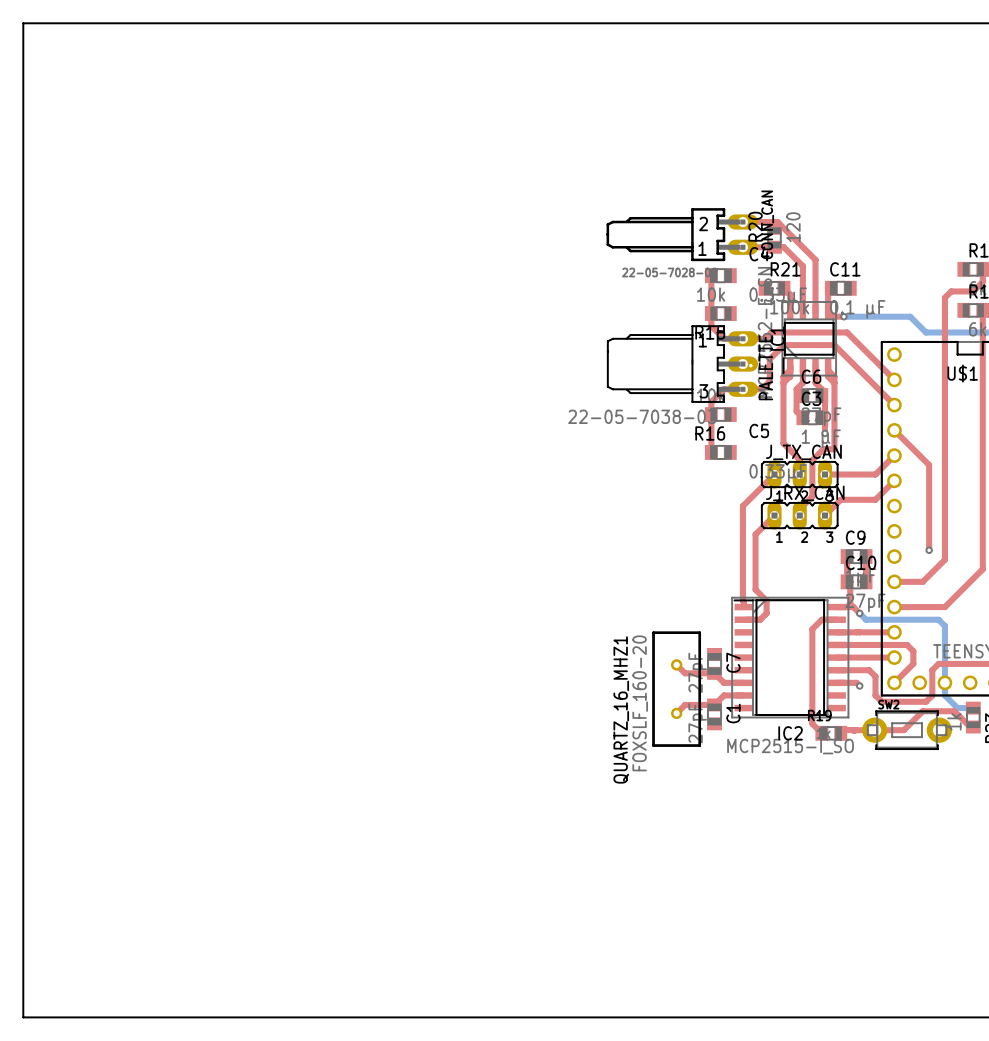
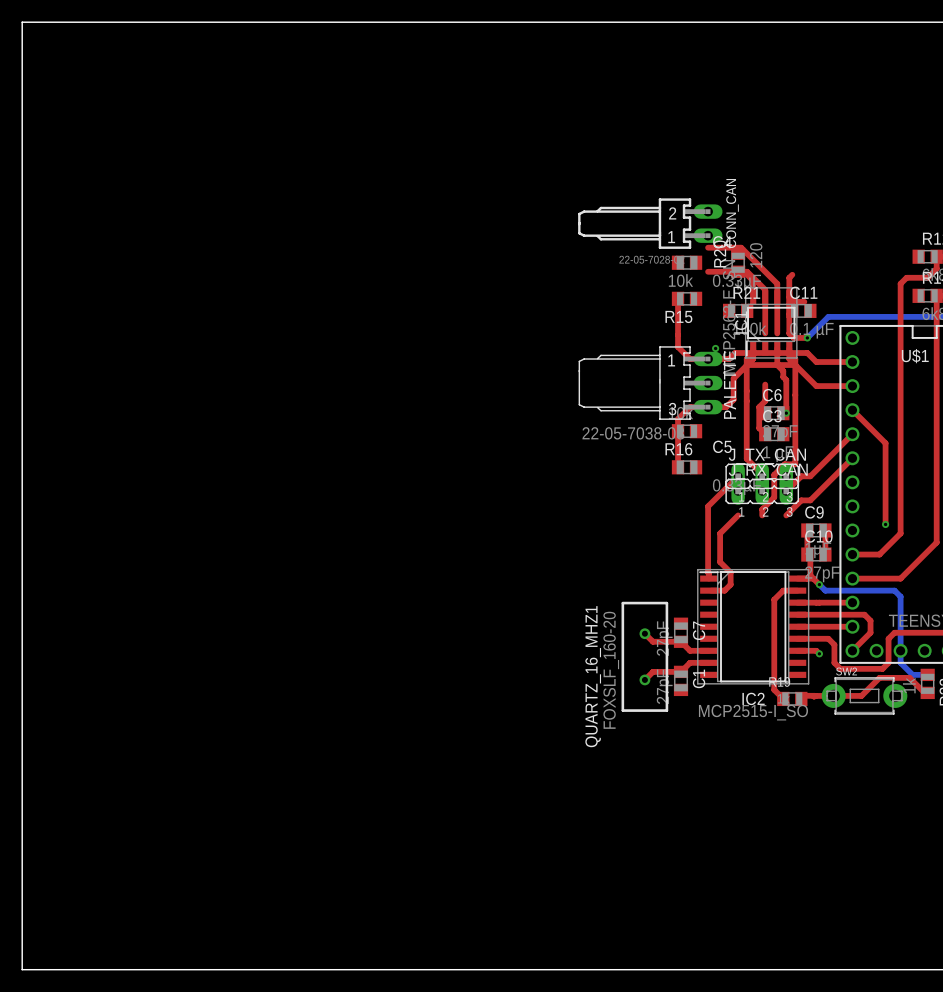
top track: (742, 222) (777, 222) (815, 259) (815, 297) -> (708, 247) (741, 247) (777, 283)
R20 position: (774, 237) -> (738, 262)
top track: (742, 247) (783, 247) (802, 266) (802, 304) -> (708, 271) (747, 271) (765, 289)
top track: (711, 275) (711, 313) -> (765, 297) (765, 333)
R21 position: (774, 288) -> (738, 310)
C11 position: (840, 288) -> (801, 310)
top track: none -> (777, 297) (777, 333)
bottom track: (843, 316) (910, 316) (926, 332) -> (807, 337) (828, 316) (882, 316)
via position: (843, 316) -> (807, 337)
top track: (711, 326) (723, 338) (765, 338) (771, 332) (847, 332) (894, 379) -> (678, 310) (678, 347) (690, 359) (729, 359) (735, 352) (807, 352) (816, 362) (852, 362)
top track: none -> (792, 310) (789, 313) (789, 333) (793, 337) (807, 337)
PALETTE position: (682, 364) -> (650, 383)
top track: (802, 365) (802, 382) (796, 389) (796, 411) (802, 417) -> (765, 384) (765, 401) (759, 407) (759, 428) (765, 434)
C6 position: (812, 395) -> (774, 413)
top track: (894, 405) (834, 345) (783, 345) (769, 359) (769, 381) (761, 389) (723, 389) (711, 401) (711, 439) -> (852, 386) (816, 386) (795, 365) (747, 365) (733, 378) (733, 399) (726, 407) (690, 407) (678, 419)
R16 position: (720, 414) -> (687, 431)
C3 position: (812, 417) -> (774, 434)
top track: (783, 443) (799, 459) (799, 474) -> (746, 422) (746, 458) (762, 476)
top track: (834, 449) (823, 449) (812, 460) (812, 496) (799, 509) (799, 515) -> (795, 428) (795, 464) (784, 464) (774, 474) (774, 497) (762, 509) (762, 515)
top track: none -> (678, 431) (678, 467)
C5 position: (720, 452) -> (687, 467)
top track: (774, 474) (742, 506) (742, 531) -> (738, 476) (708, 506)
J_TX_CAN position: (799, 474) -> (762, 476)
top track: (824, 474) (875, 474) -> none
top track: (850, 499) (875, 499) -> (810, 476) (834, 452)
top track: none -> (834, 476) (810, 500) (801, 500) (786, 515)
top track: (774, 515) (755, 534) (755, 559) -> (738, 515) (720, 533)

